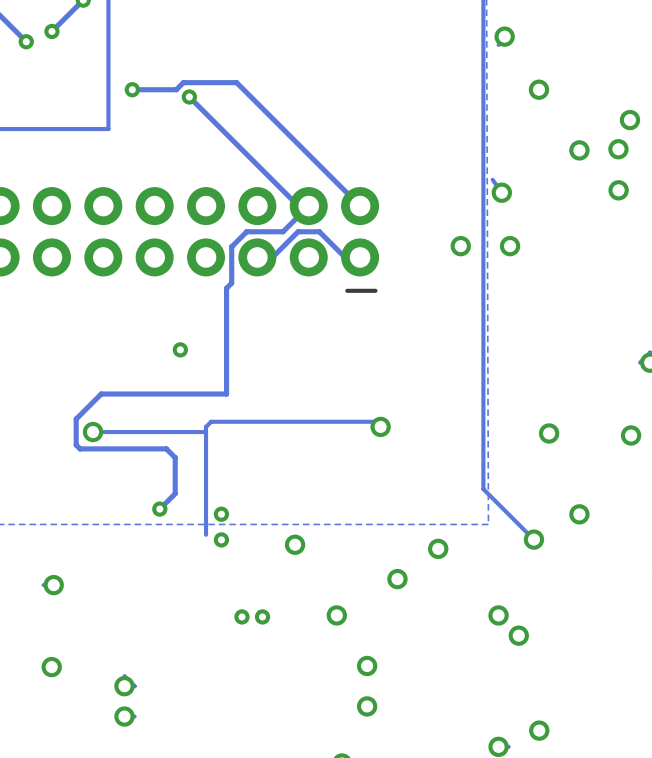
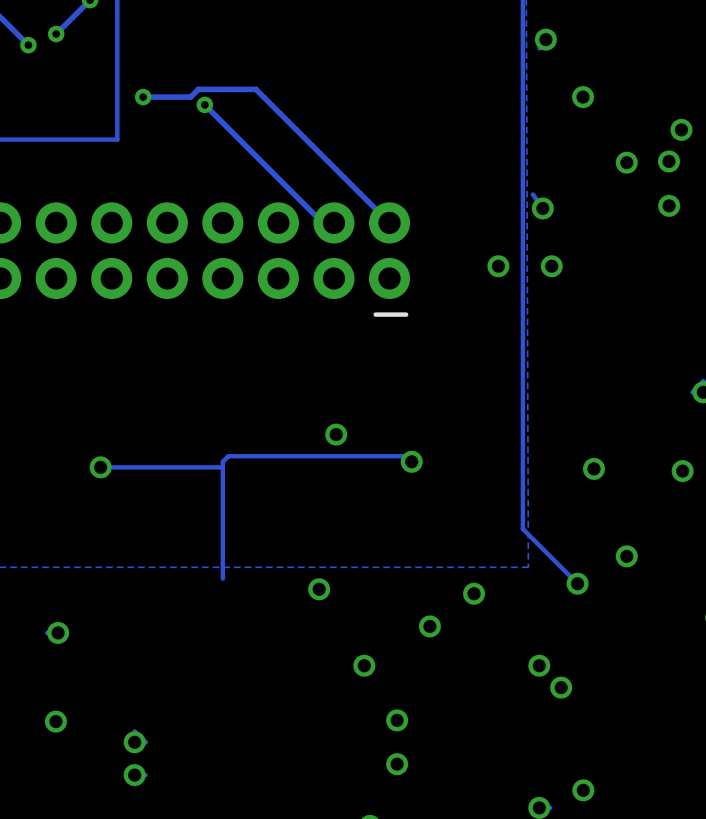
track: (308, 206) (283, 231) (246, 231) (231, 246) (231, 283) (226, 288) (226, 394) (101, 394) (76, 419) (76, 444) (80, 448) (166, 448) (175, 457) (175, 493) (159, 509) -> none
track: (360, 257) (345, 257) (319, 231) (298, 231) (272, 257) (257, 257) -> none
via: (180, 349) -> none
via: none -> (336, 434)
via: (159, 509) -> none
via: (221, 514) -> none
via: (221, 539) -> none
via: (241, 616) -> none
via: (262, 616) -> none

